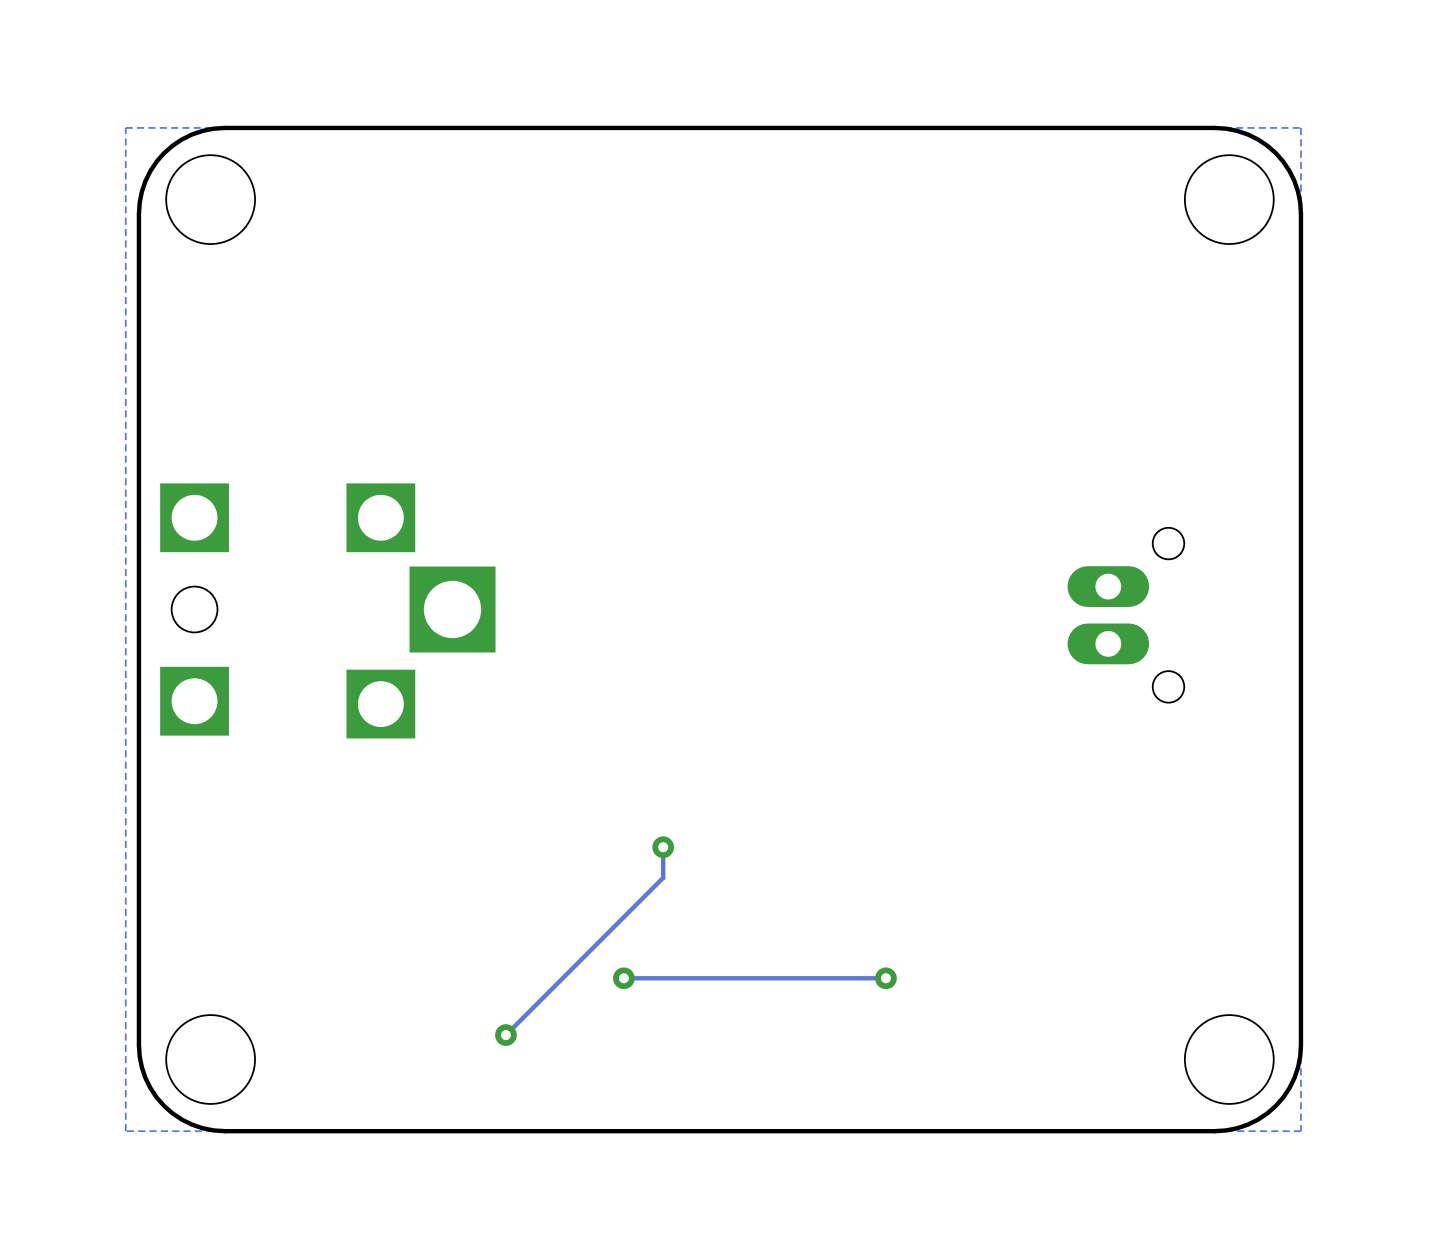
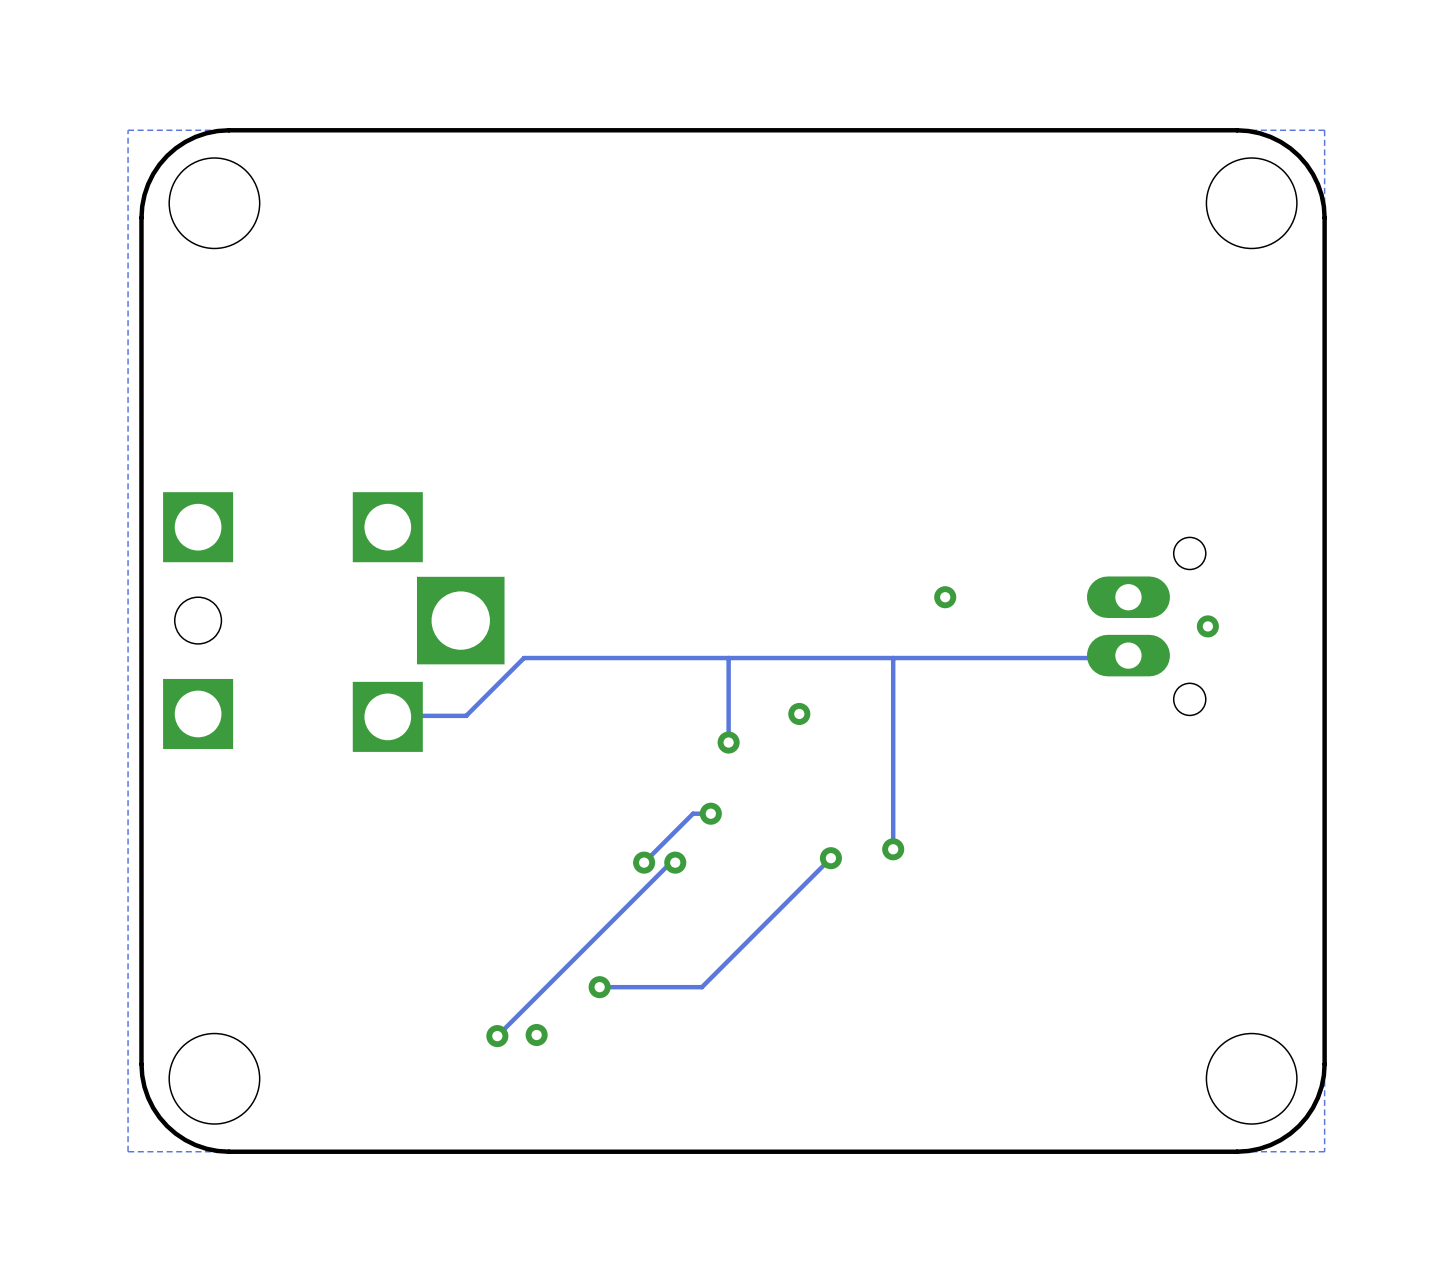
via: none -> (945, 597)
via: none -> (1207, 626)
track: none -> (1128, 655) (1124, 658) (524, 658) (466, 715) (387, 716)
track: none -> (728, 658) (728, 742)
track: none -> (893, 658) (893, 849)
via: none -> (799, 713)
via: none -> (728, 742)
track: none -> (710, 813) (693, 813) (644, 862)
via: none -> (710, 813)
via: none -> (893, 849)
track: none -> (830, 858) (701, 987) (599, 987)
via: none -> (830, 858)
via: none -> (644, 862)
track: none -> (670, 862) (497, 1036)
track: (663, 847) (663, 877) (505, 1035) -> none
via position: (623, 978) -> (599, 987)
track: (885, 978) (623, 978) -> none
via: (885, 978) -> none
via: none -> (536, 1035)
via: none -> (497, 1036)
via: (505, 1035) -> none

